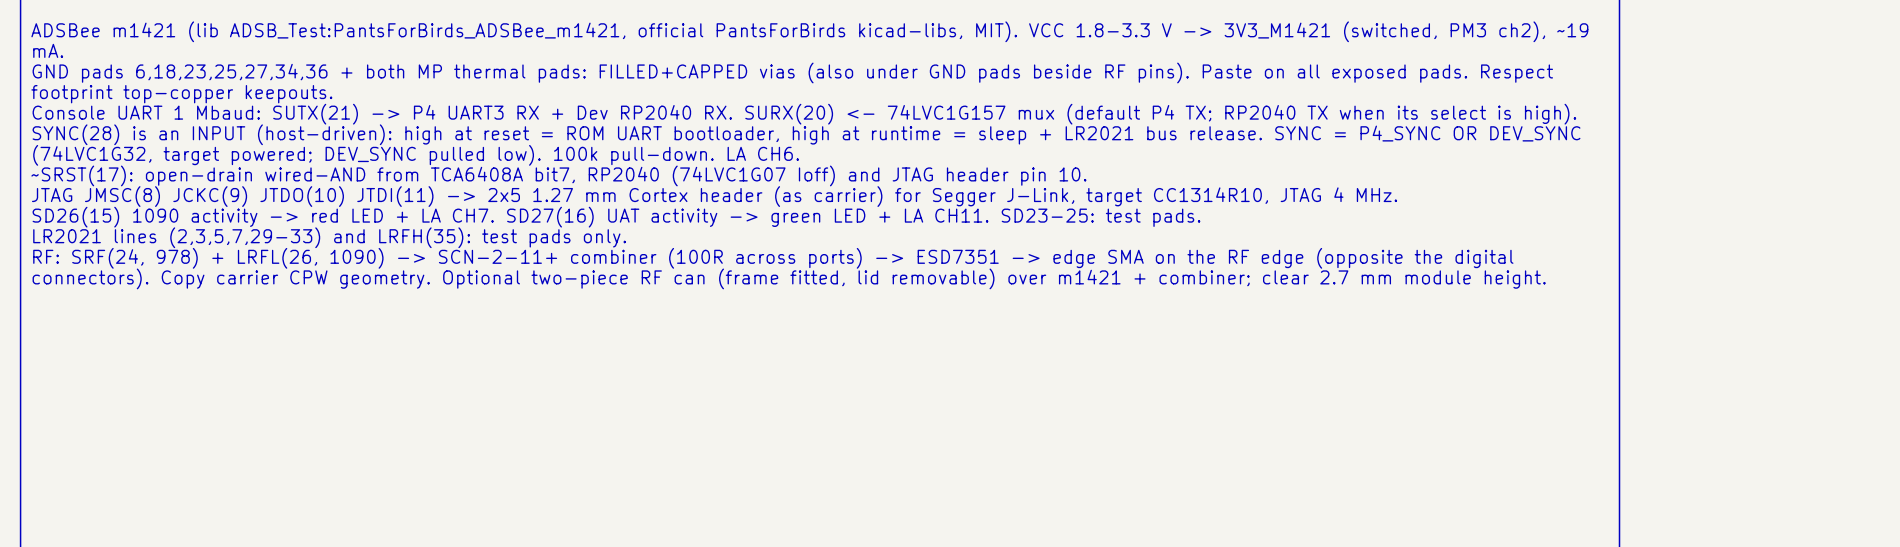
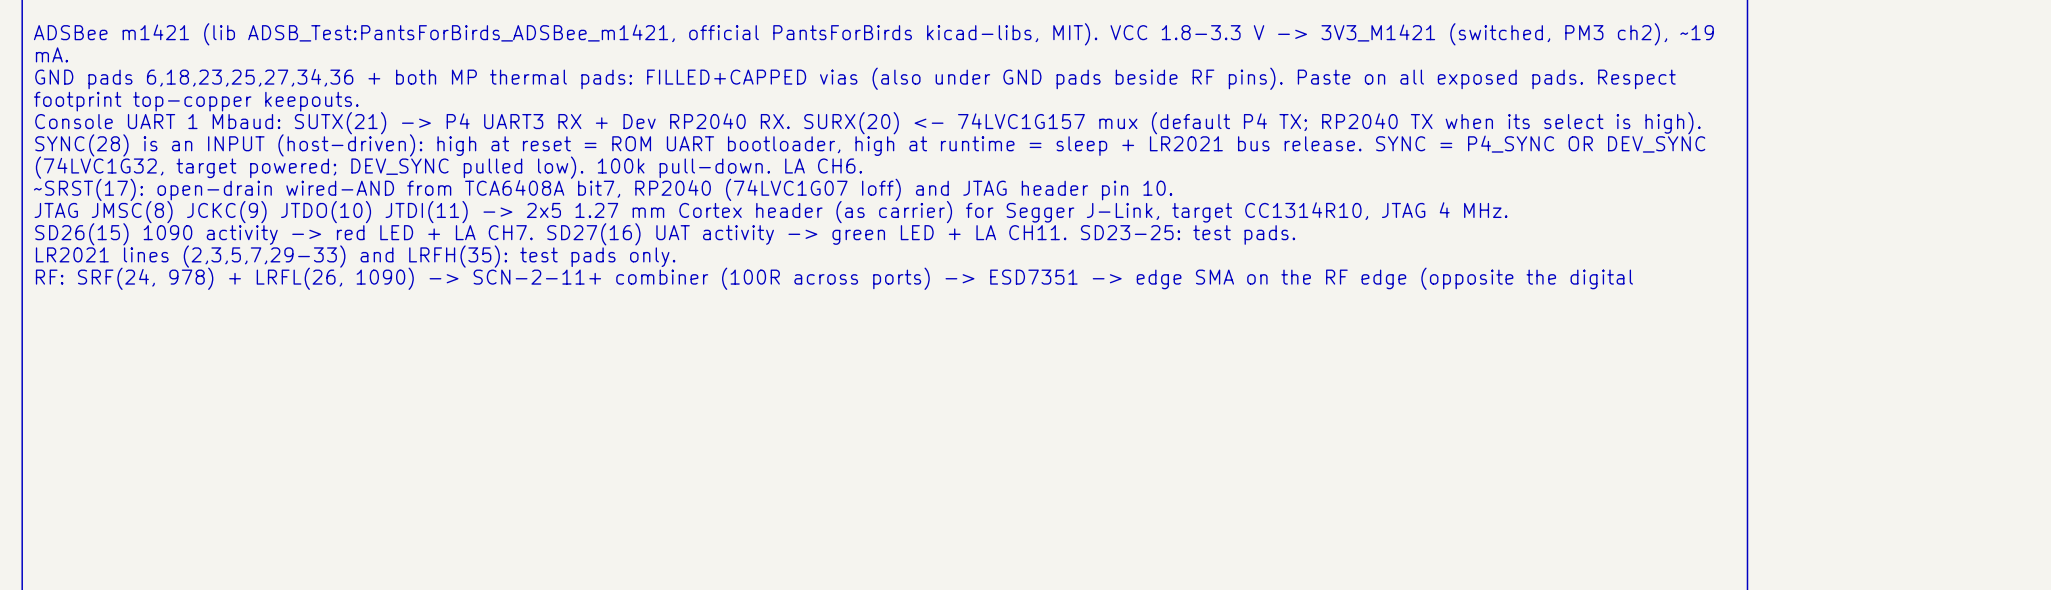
text: connectors). Copy carrier CPW geometry. Optional two-piece RF can (frame fitted, lid removable) over m1421 + combiner; clear 2.7 mm module height. (789, 278) -> none

